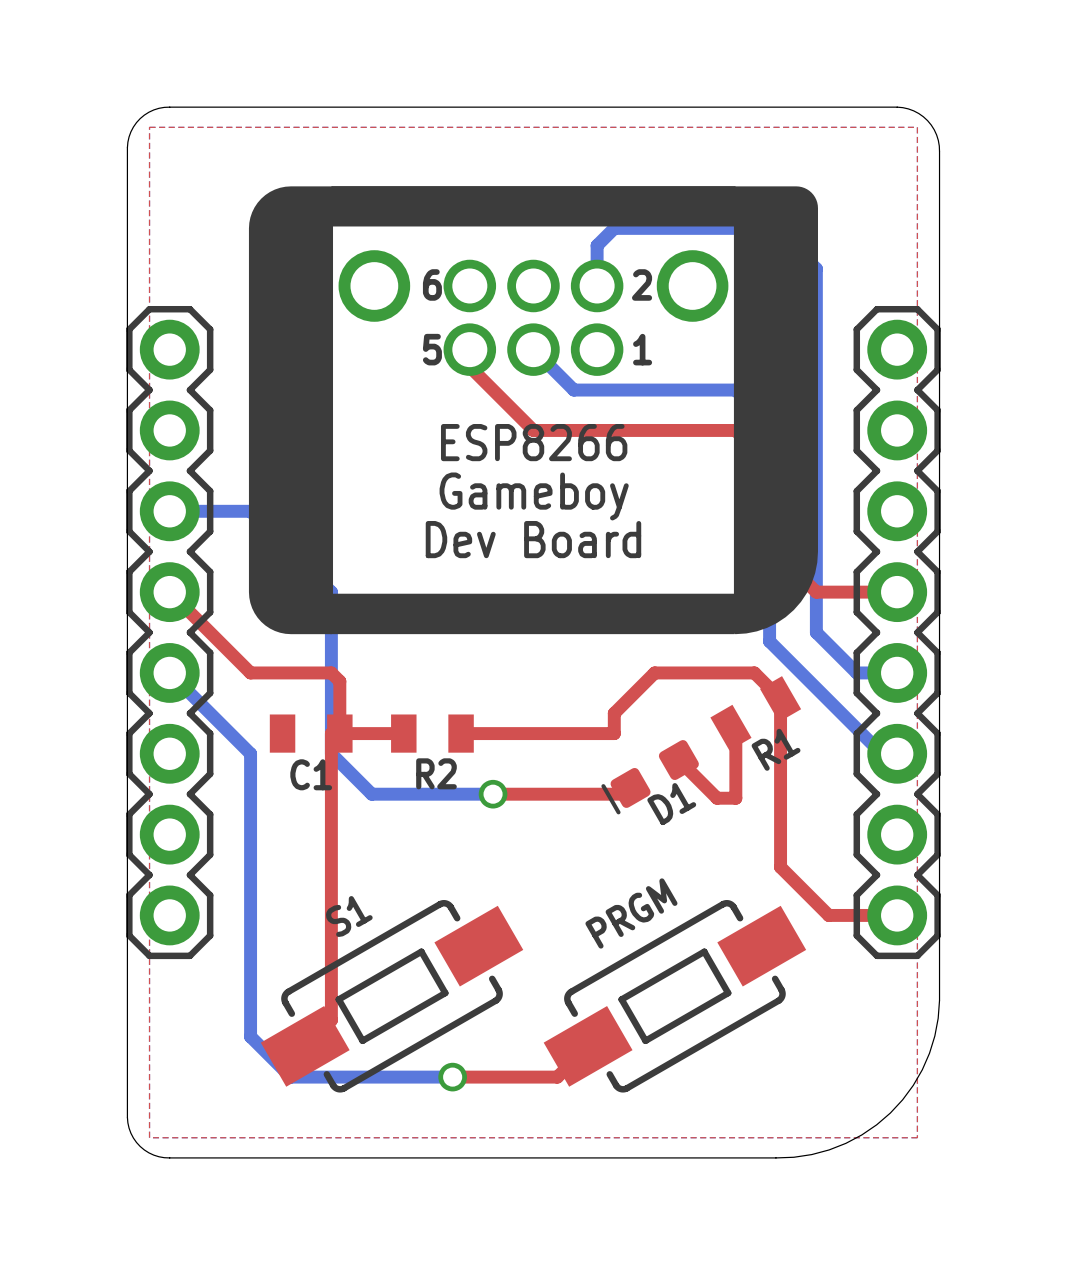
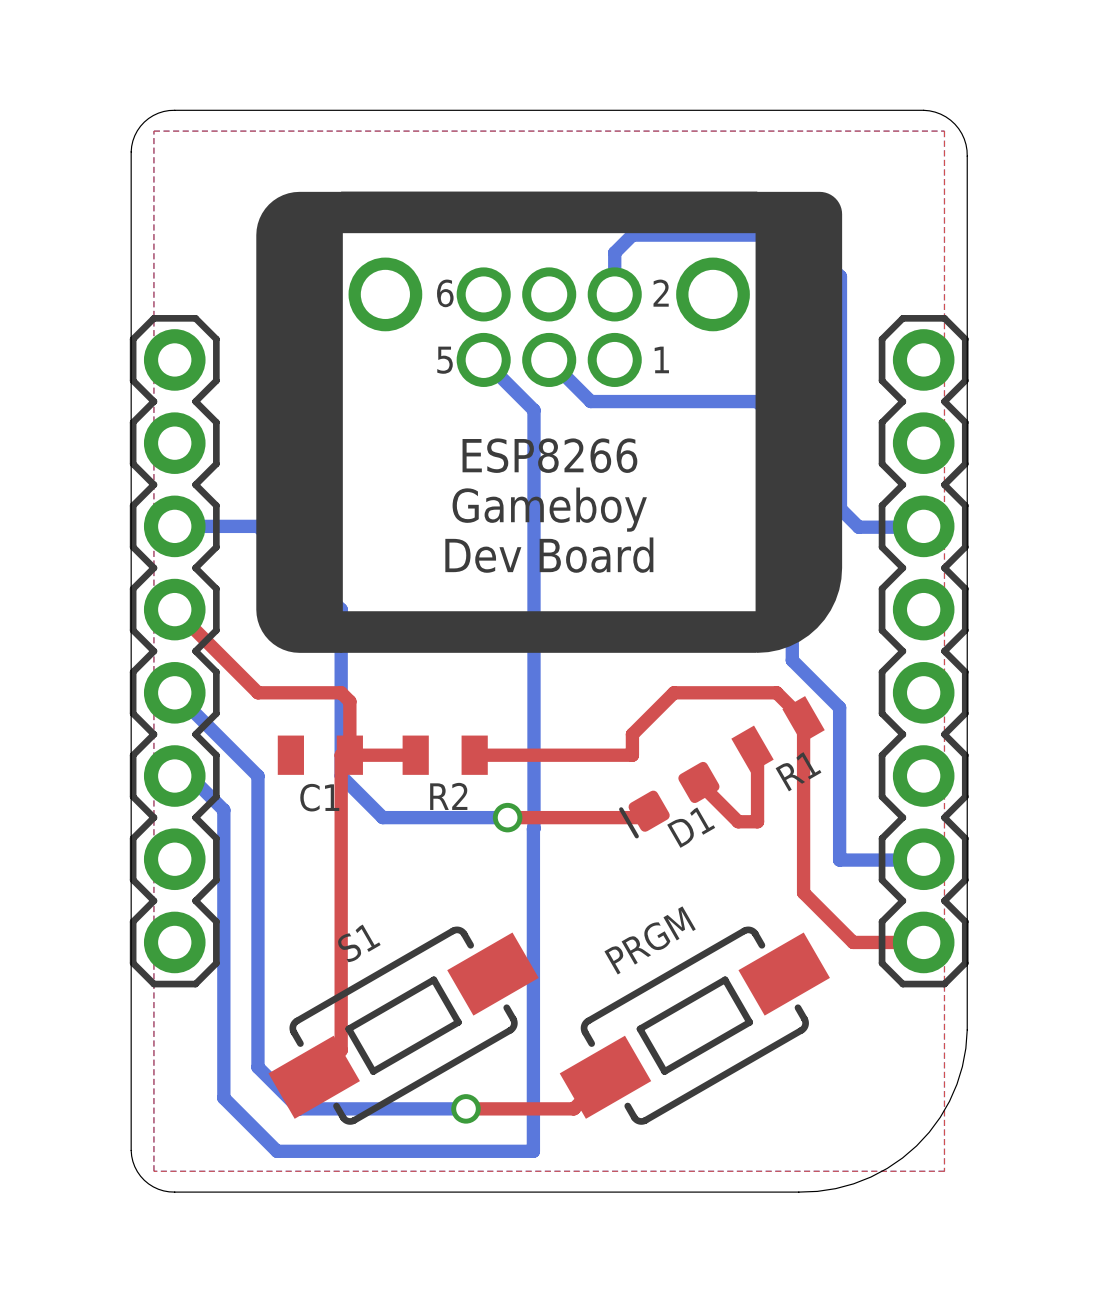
top track: (469, 349) (469, 366) (533, 430) (735, 430) (775, 470) (775, 551) (816, 592) (897, 592) -> none
bottom track: none -> (483, 359) (533, 410) (533, 1151) (277, 1151) (223, 1098) (223, 810) (189, 776) (174, 776)
bottom track: (816, 494) (816, 632) (856, 672) (897, 672) -> (840, 508) (858, 527) (923, 526)
bottom track: (815, 687) (875, 747) (891, 747) (897, 753) -> (839, 707) (839, 860) (923, 859)

